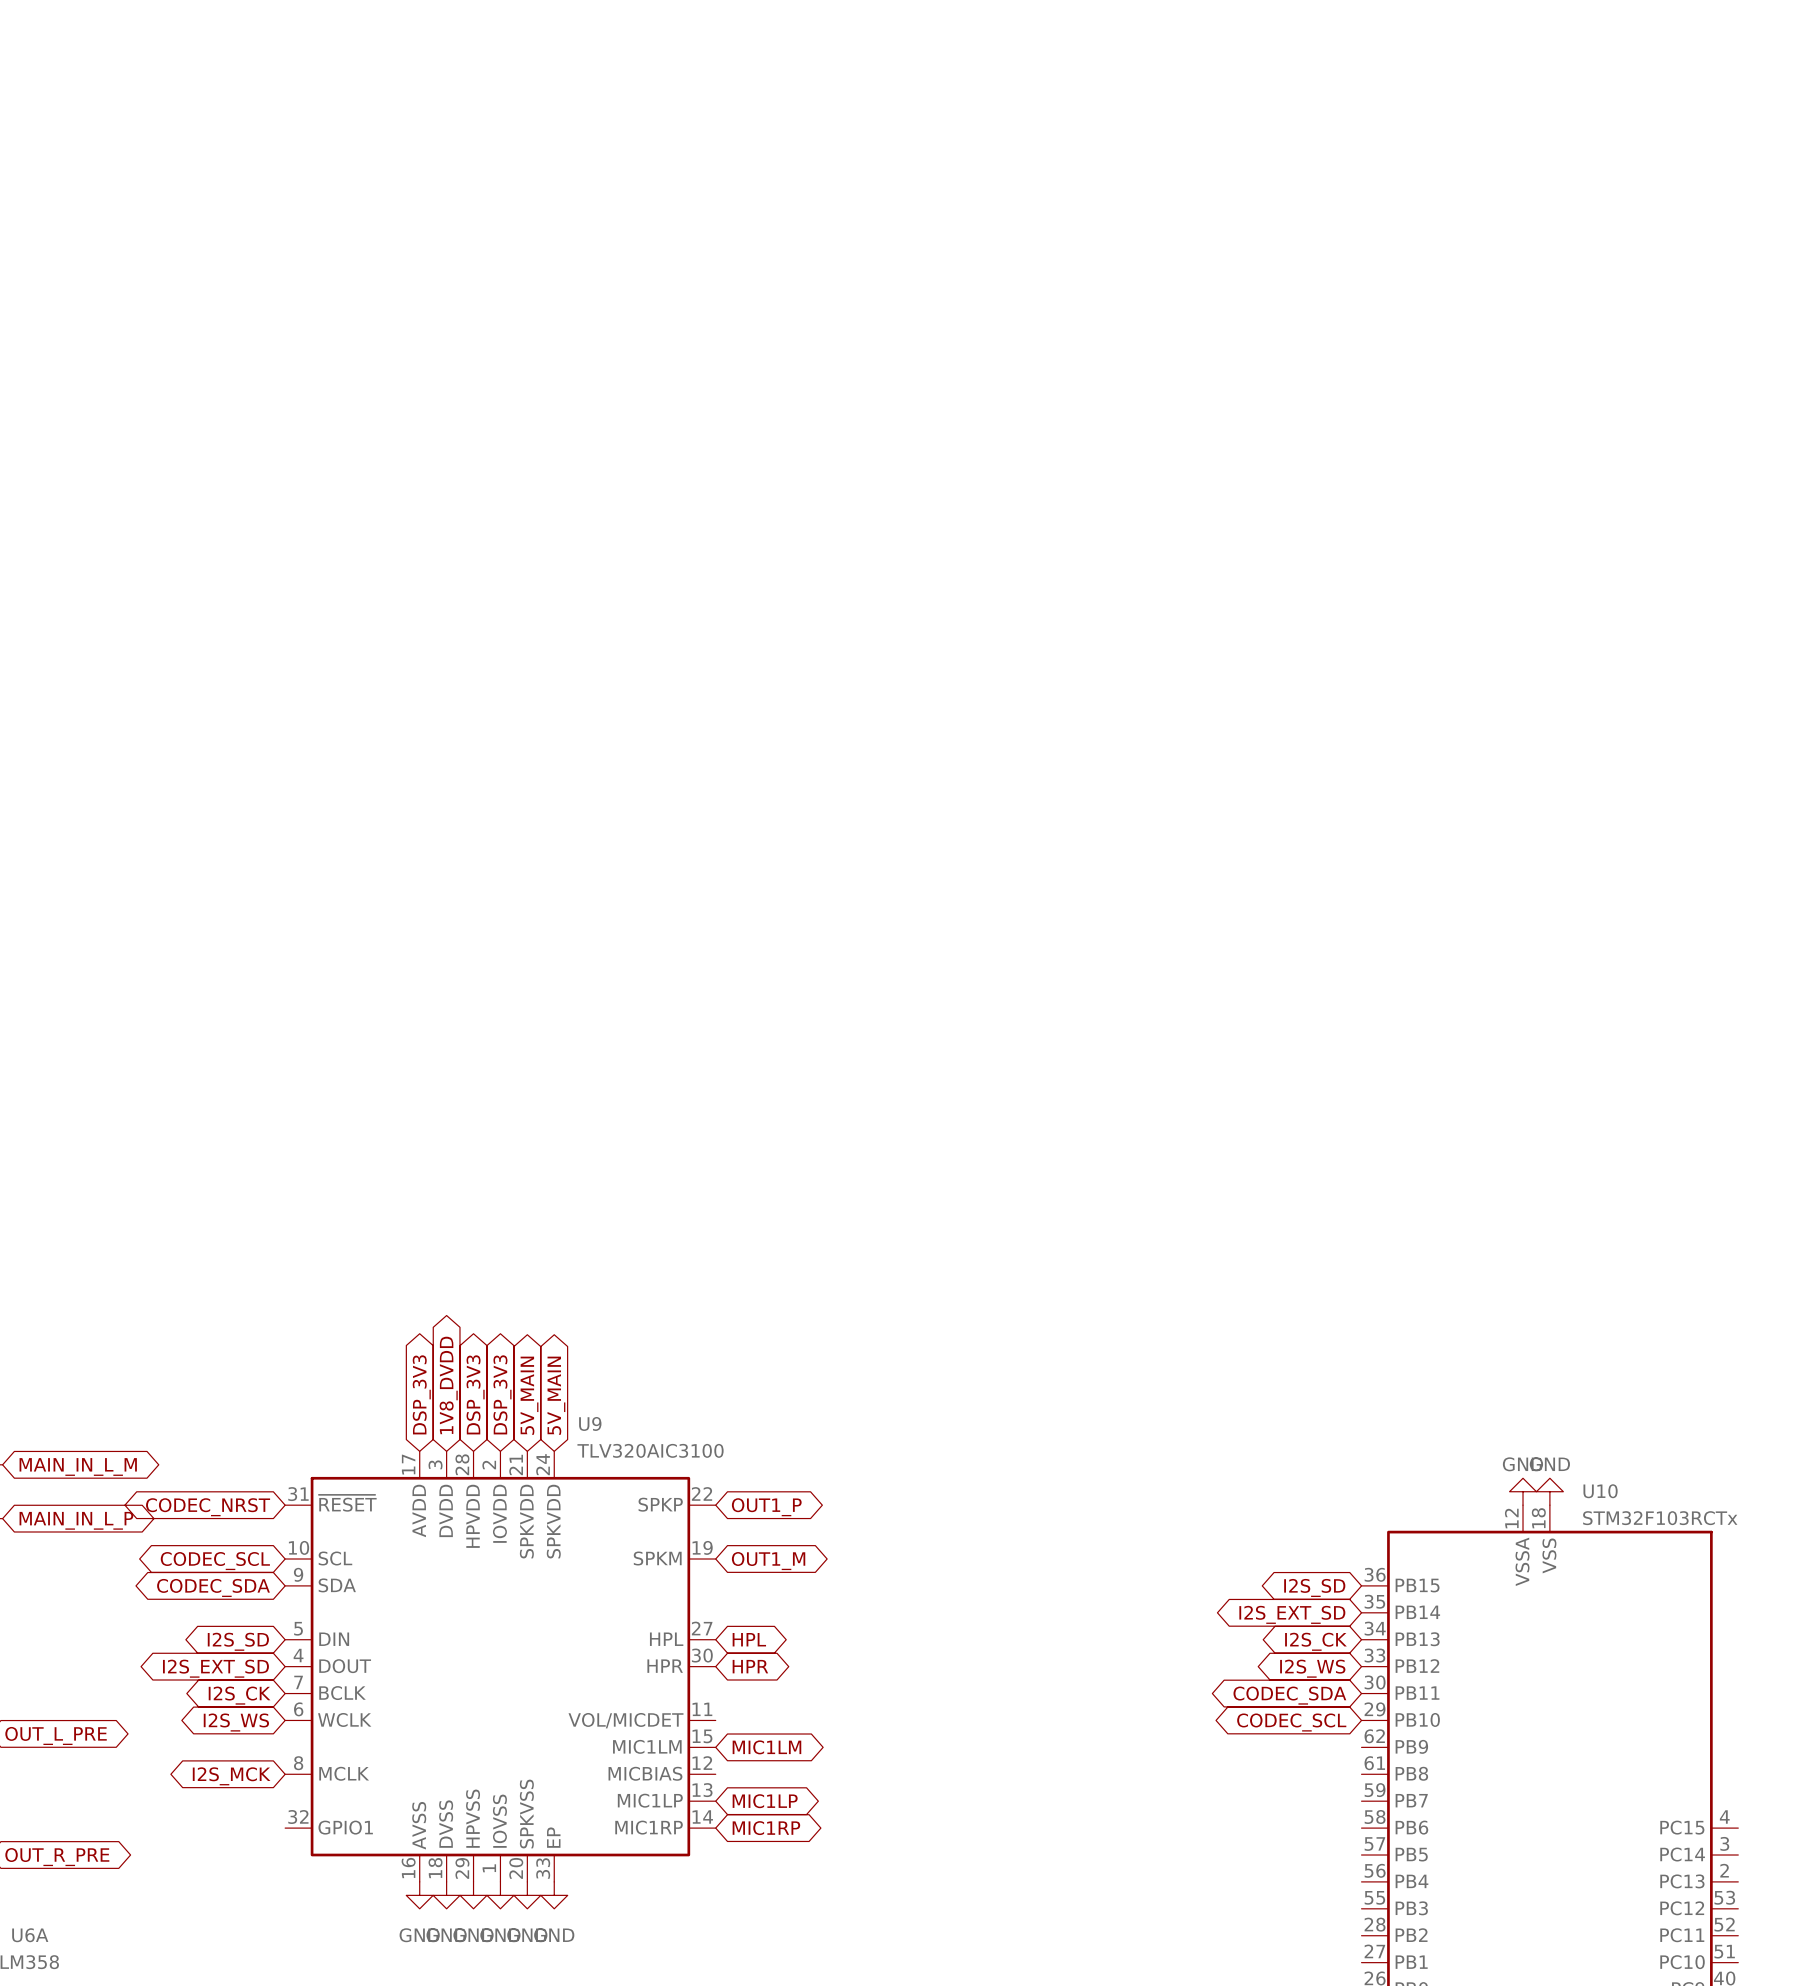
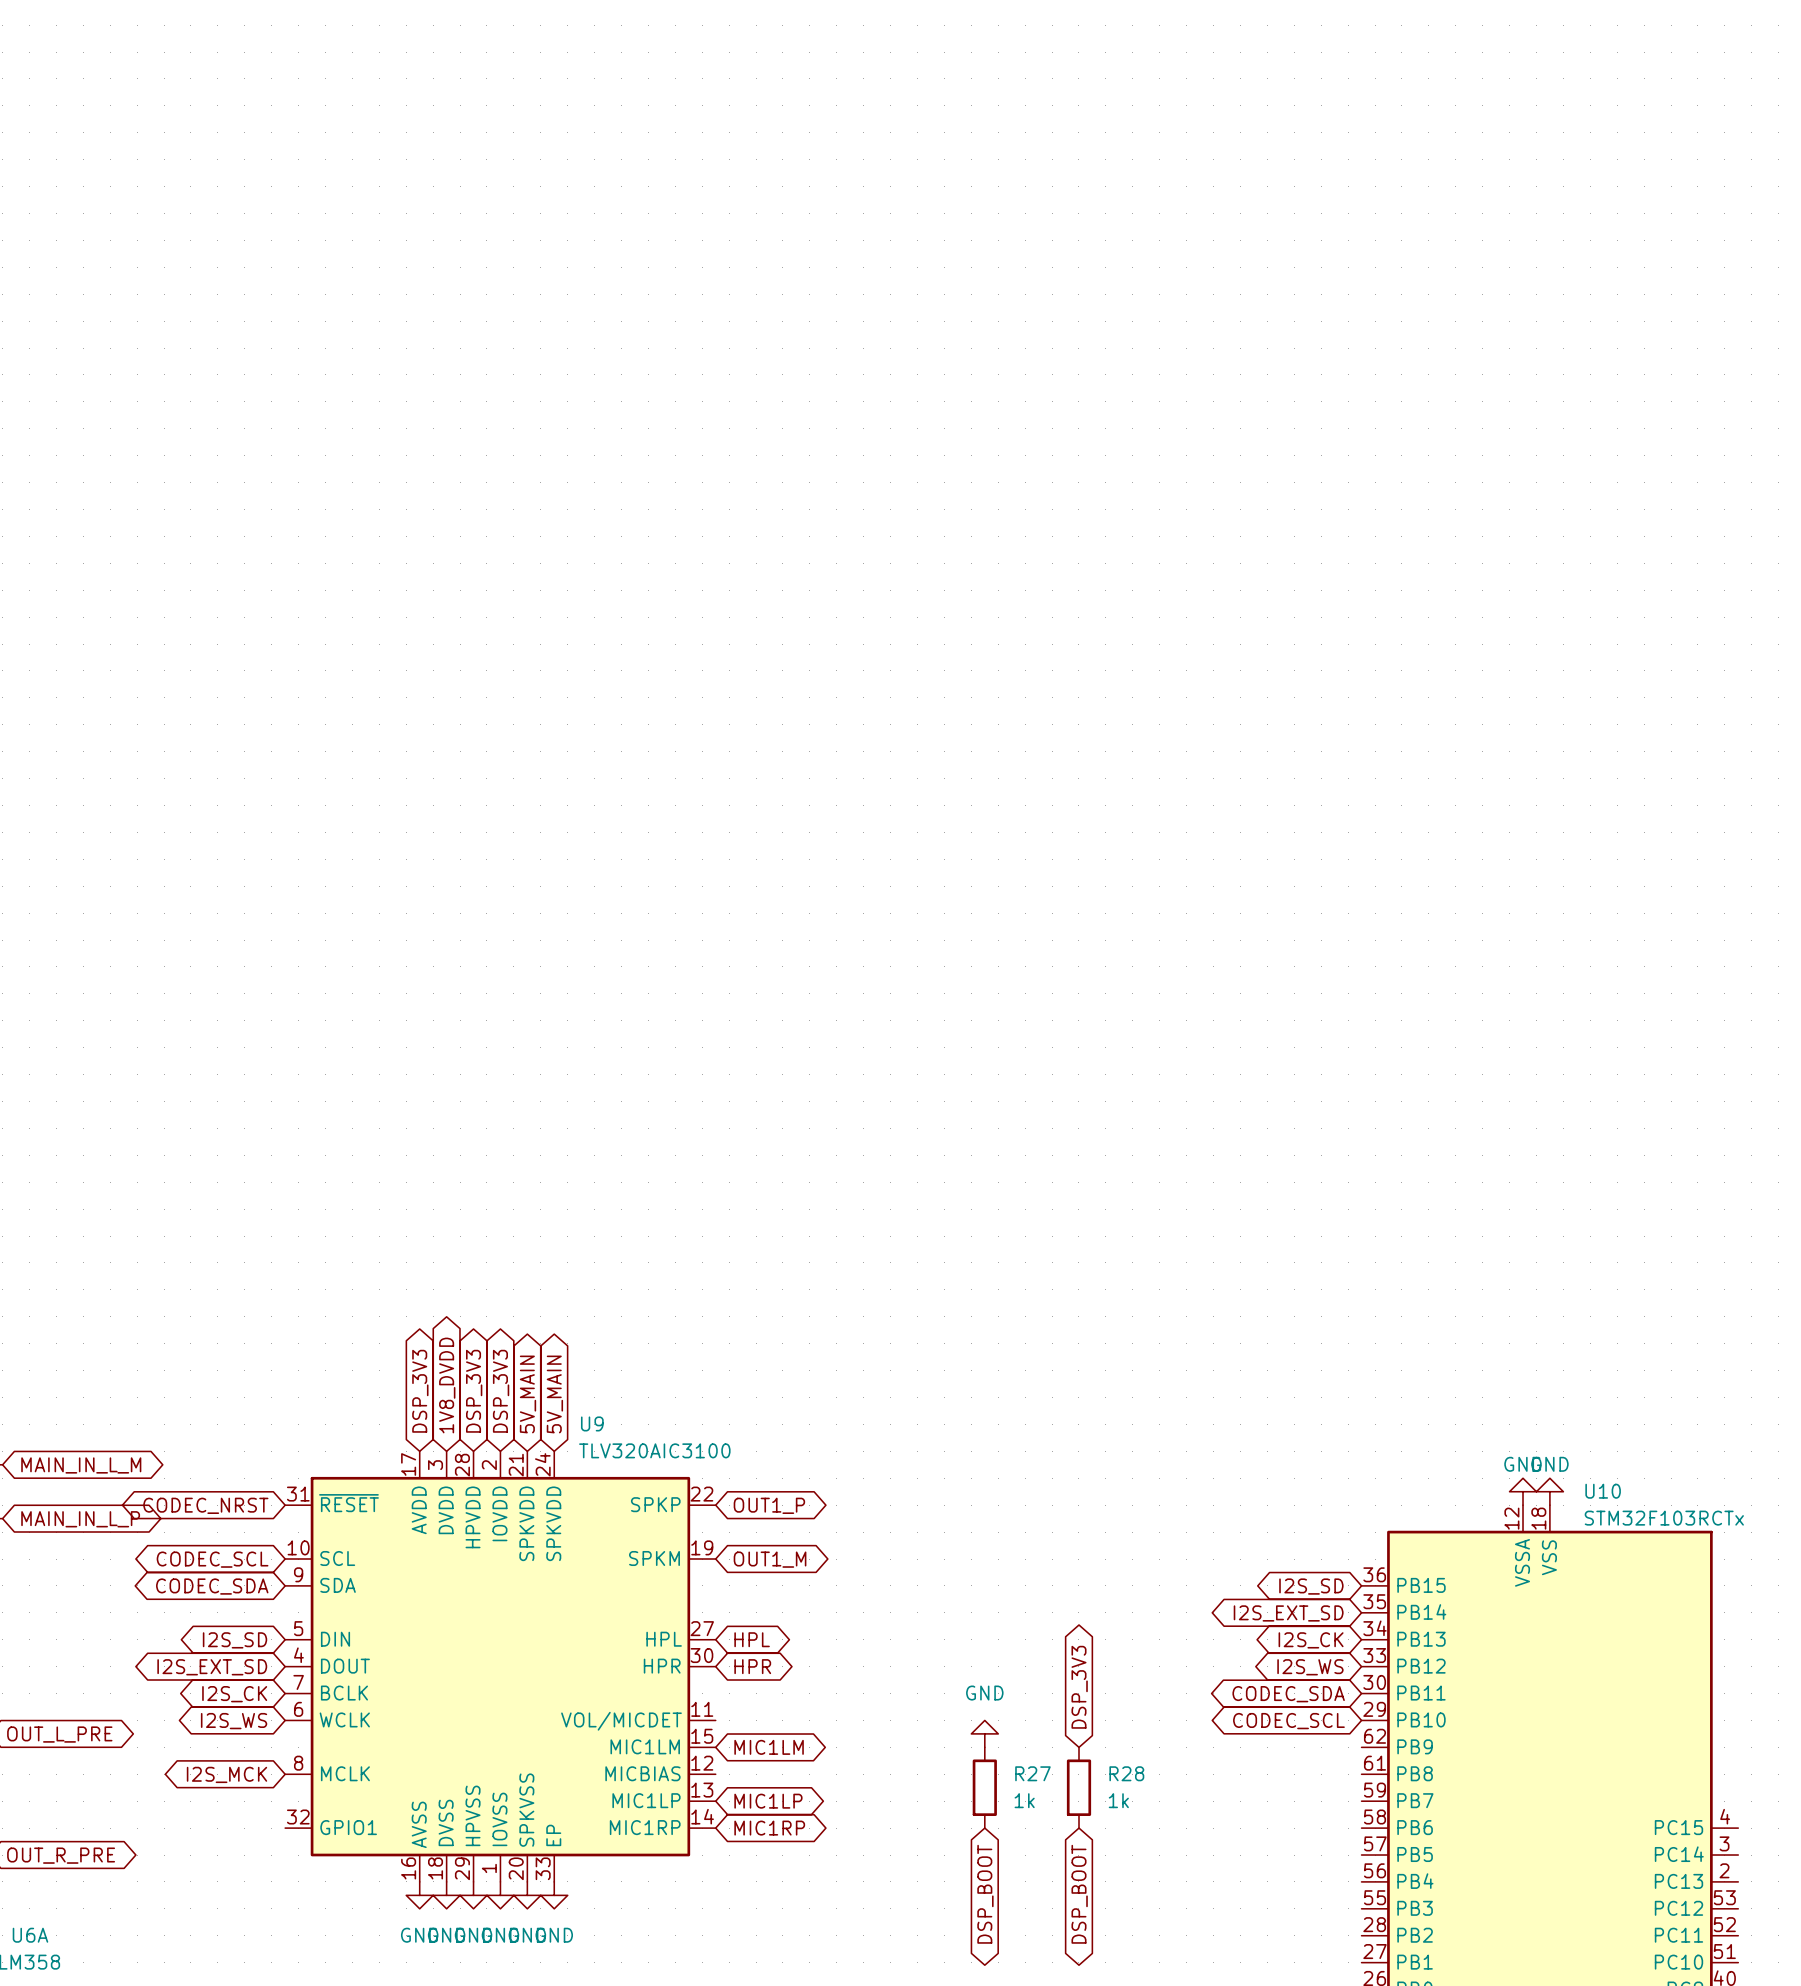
global label: none -> DSP_3V3 (1079, 1687)
power symbol: none -> GND (984, 1733)
R27: none -> 1k (984, 1787)
R28: none -> 1k (1078, 1787)
global label: none -> DSP_BOOT (985, 1894)
global label: none -> DSP_BOOT (1079, 1894)

